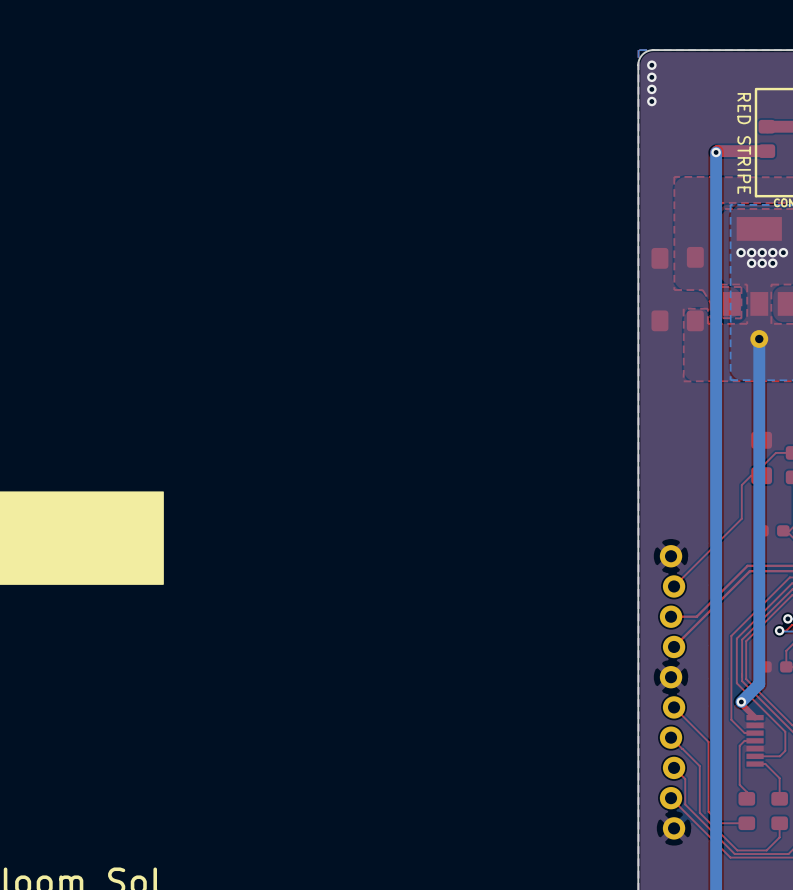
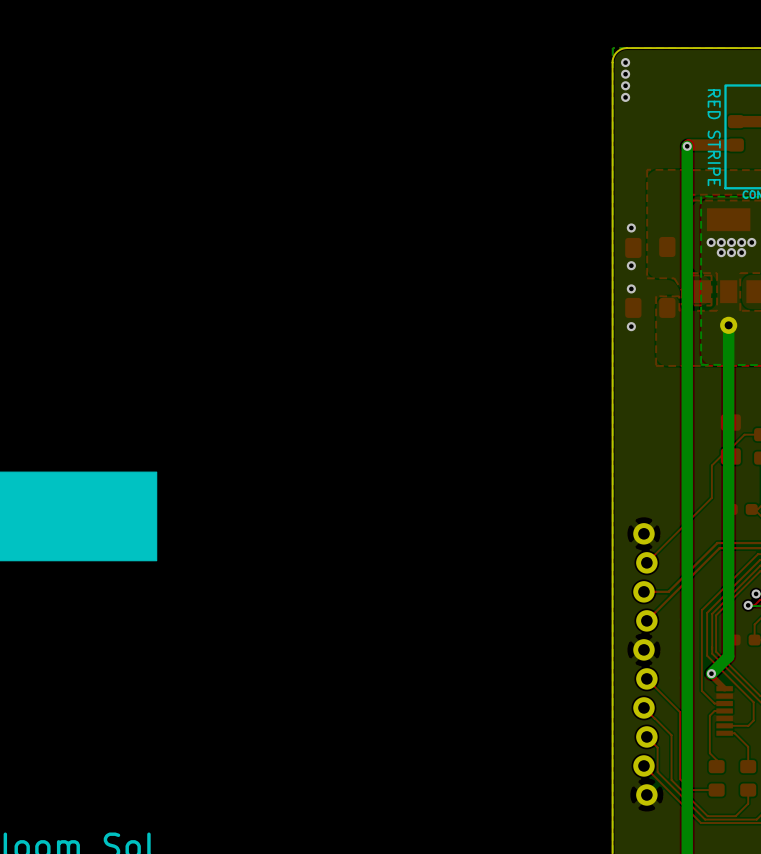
via: none -> (631, 227)
via: none -> (631, 265)
via: none -> (631, 288)
via: none -> (631, 326)

